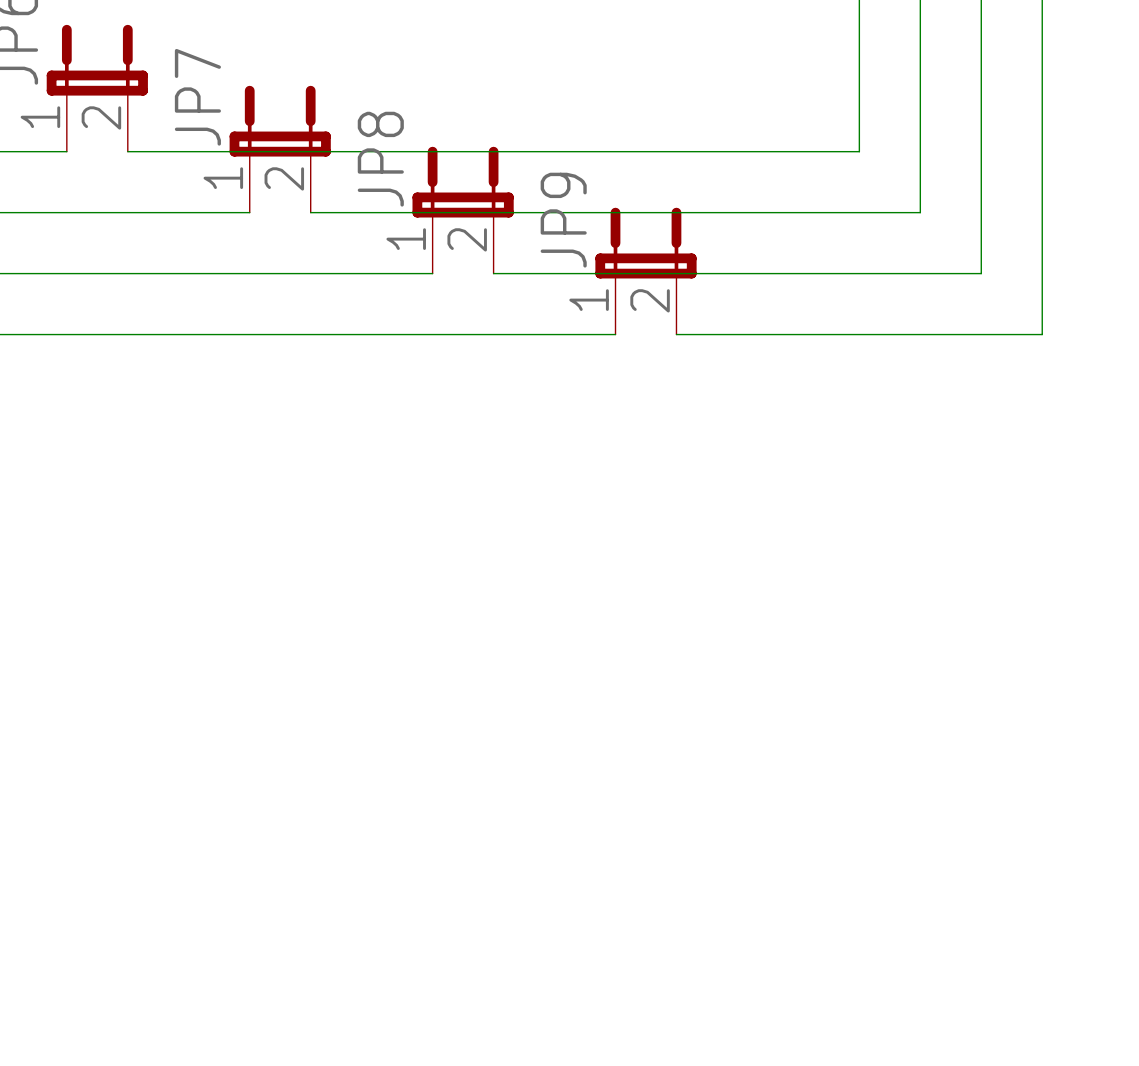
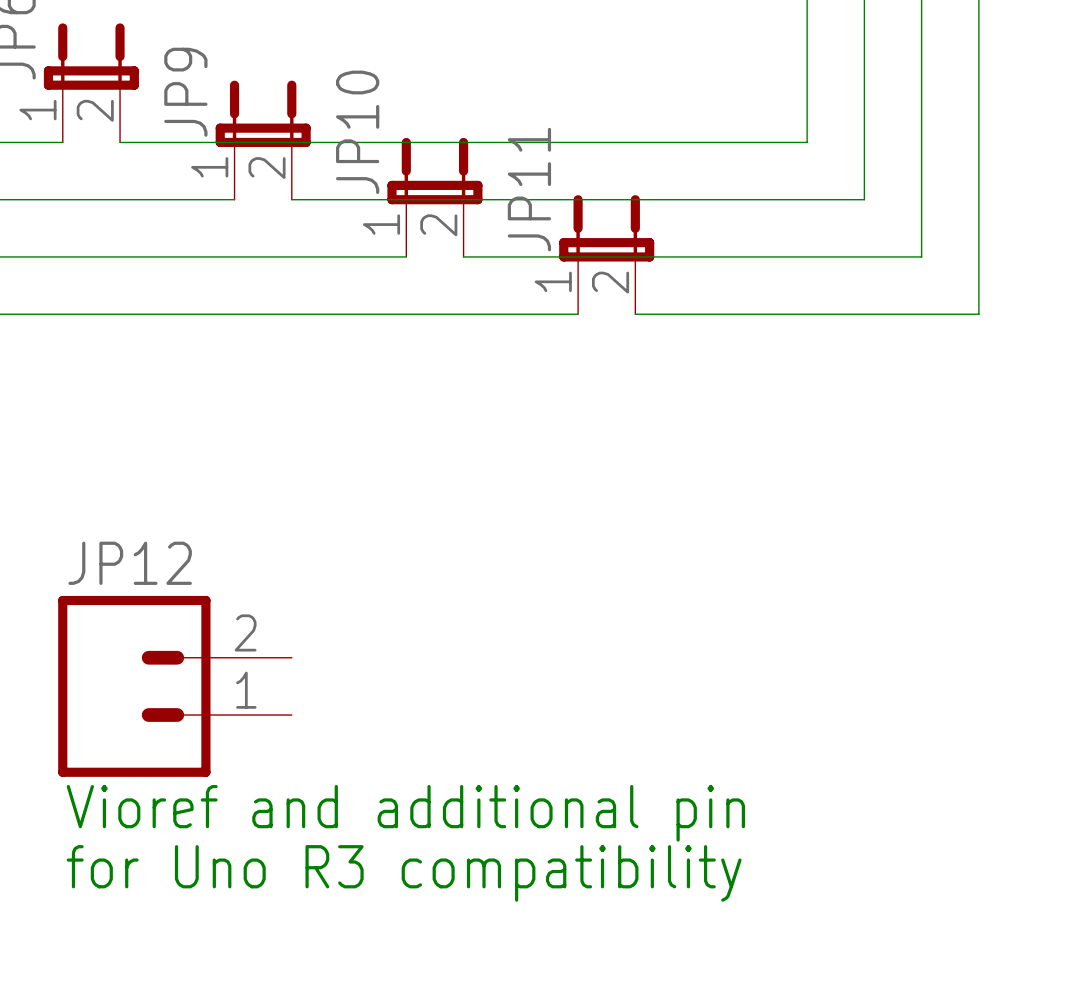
JP7 name: JP7 (197, 97) -> JP9 (185, 92)
JP8 name: JP8 (380, 159) -> JP10 (357, 132)
JP9 name: JP9 (563, 220) -> JP11 (529, 189)
JP12: none -> (175, 686)
text: none -> Vioref and additional pin (405, 813)
text: none -> for Uno R3 compatibility (404, 873)

